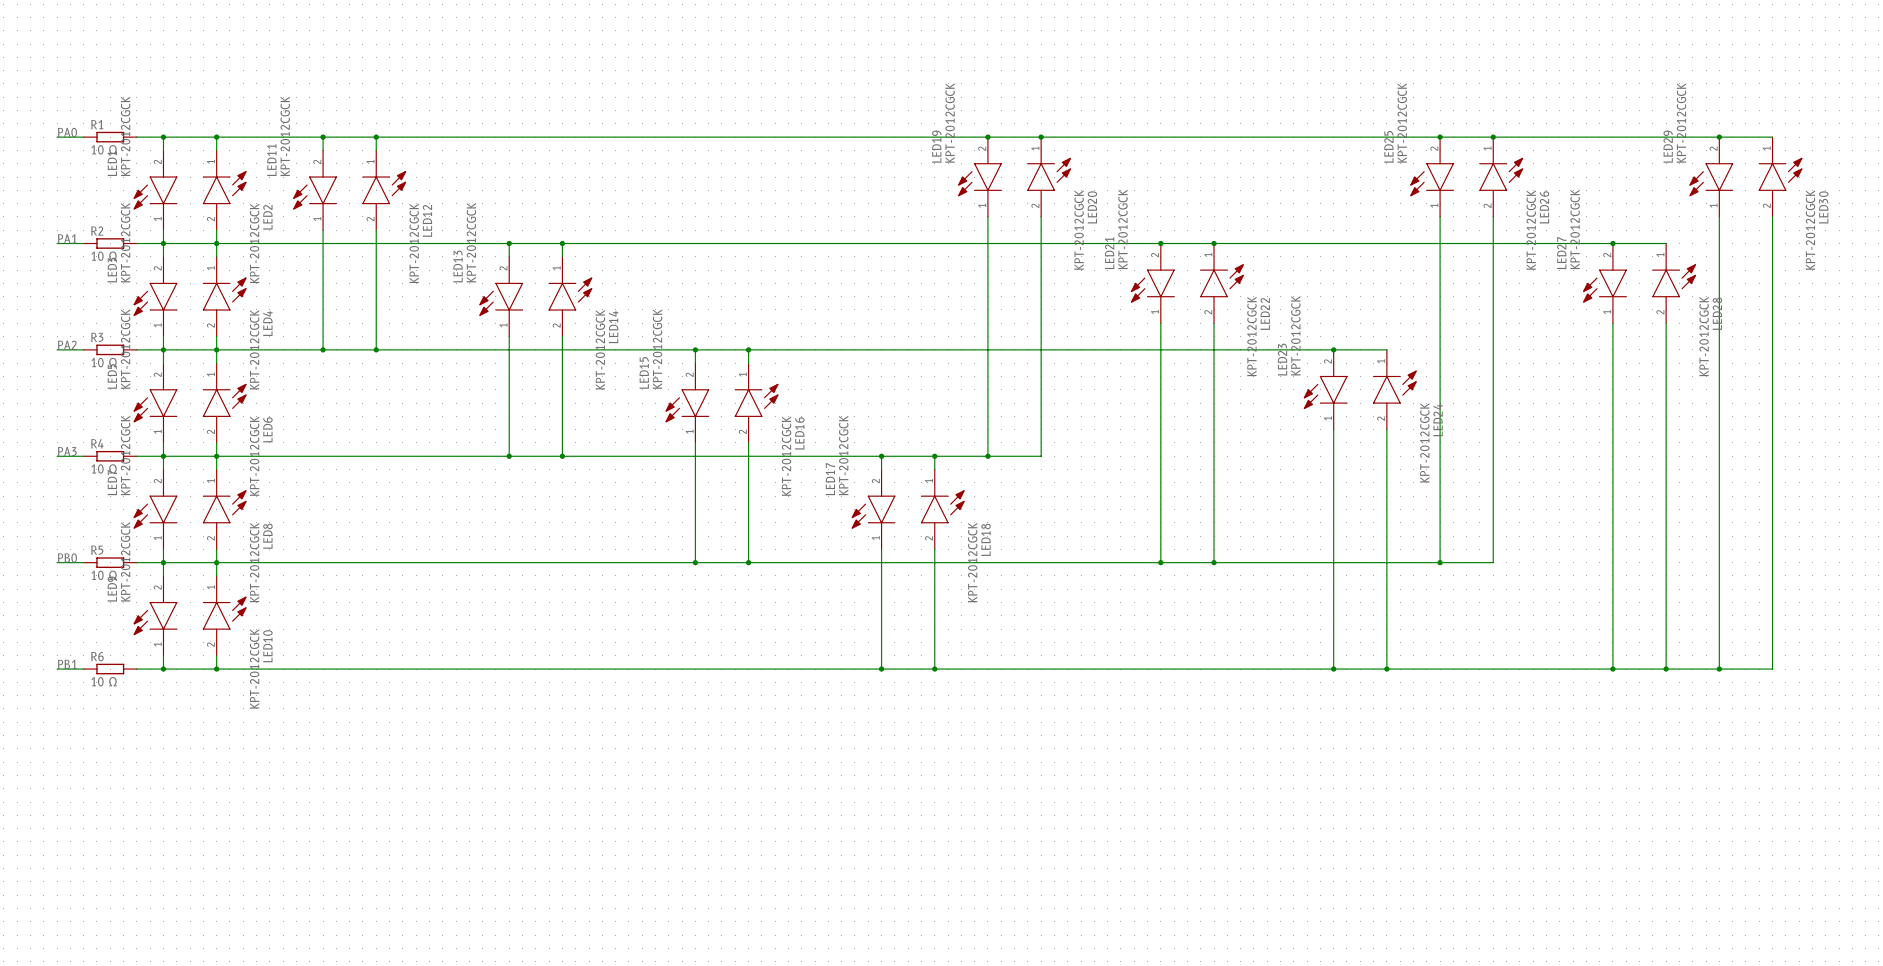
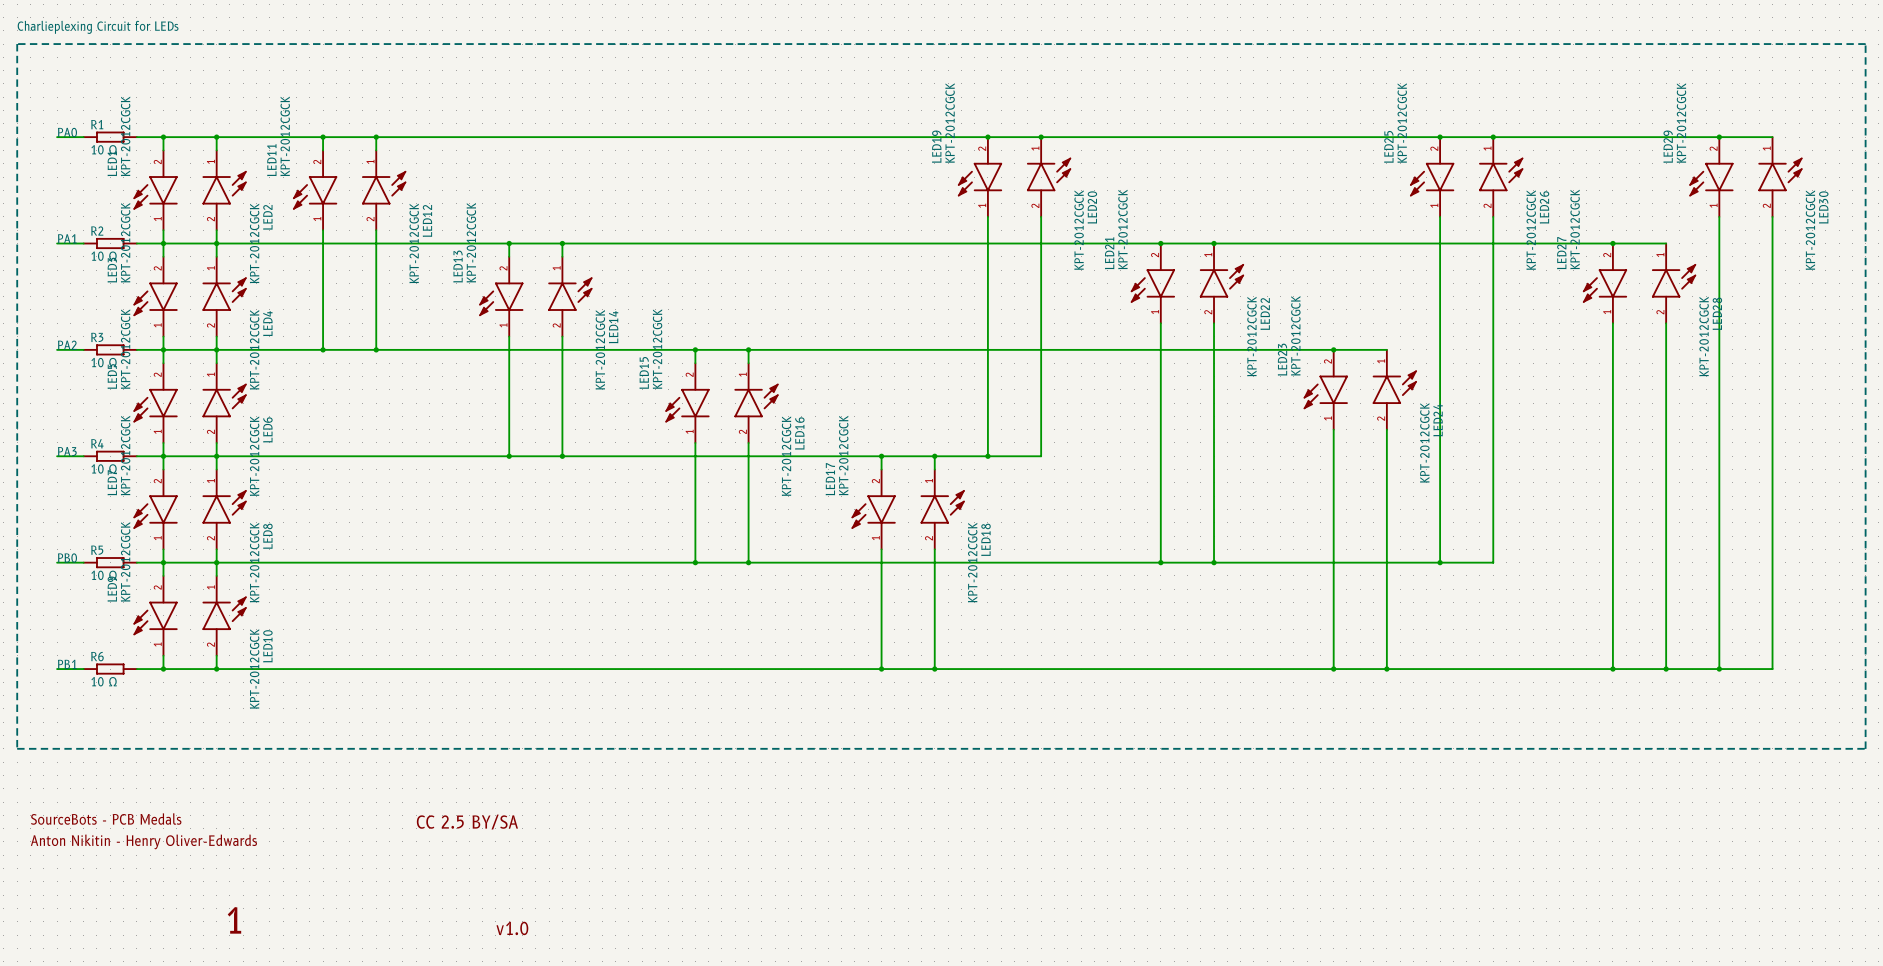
text: none -> Charlieplexing Circuit for LEDs (98, 27)
line: none -> (17, 44) (17, 748) (1865, 748) (1865, 44) (17, 44)
text: none -> SourceBots - PCB Medals (106, 819)
text: none -> CC 2.5 BY/SA (467, 822)
text: none -> Anton Nikitin - Henry Oliver-Edwards (143, 841)
text: none -> 1 (234, 920)
text: none -> v1.0 (512, 928)

